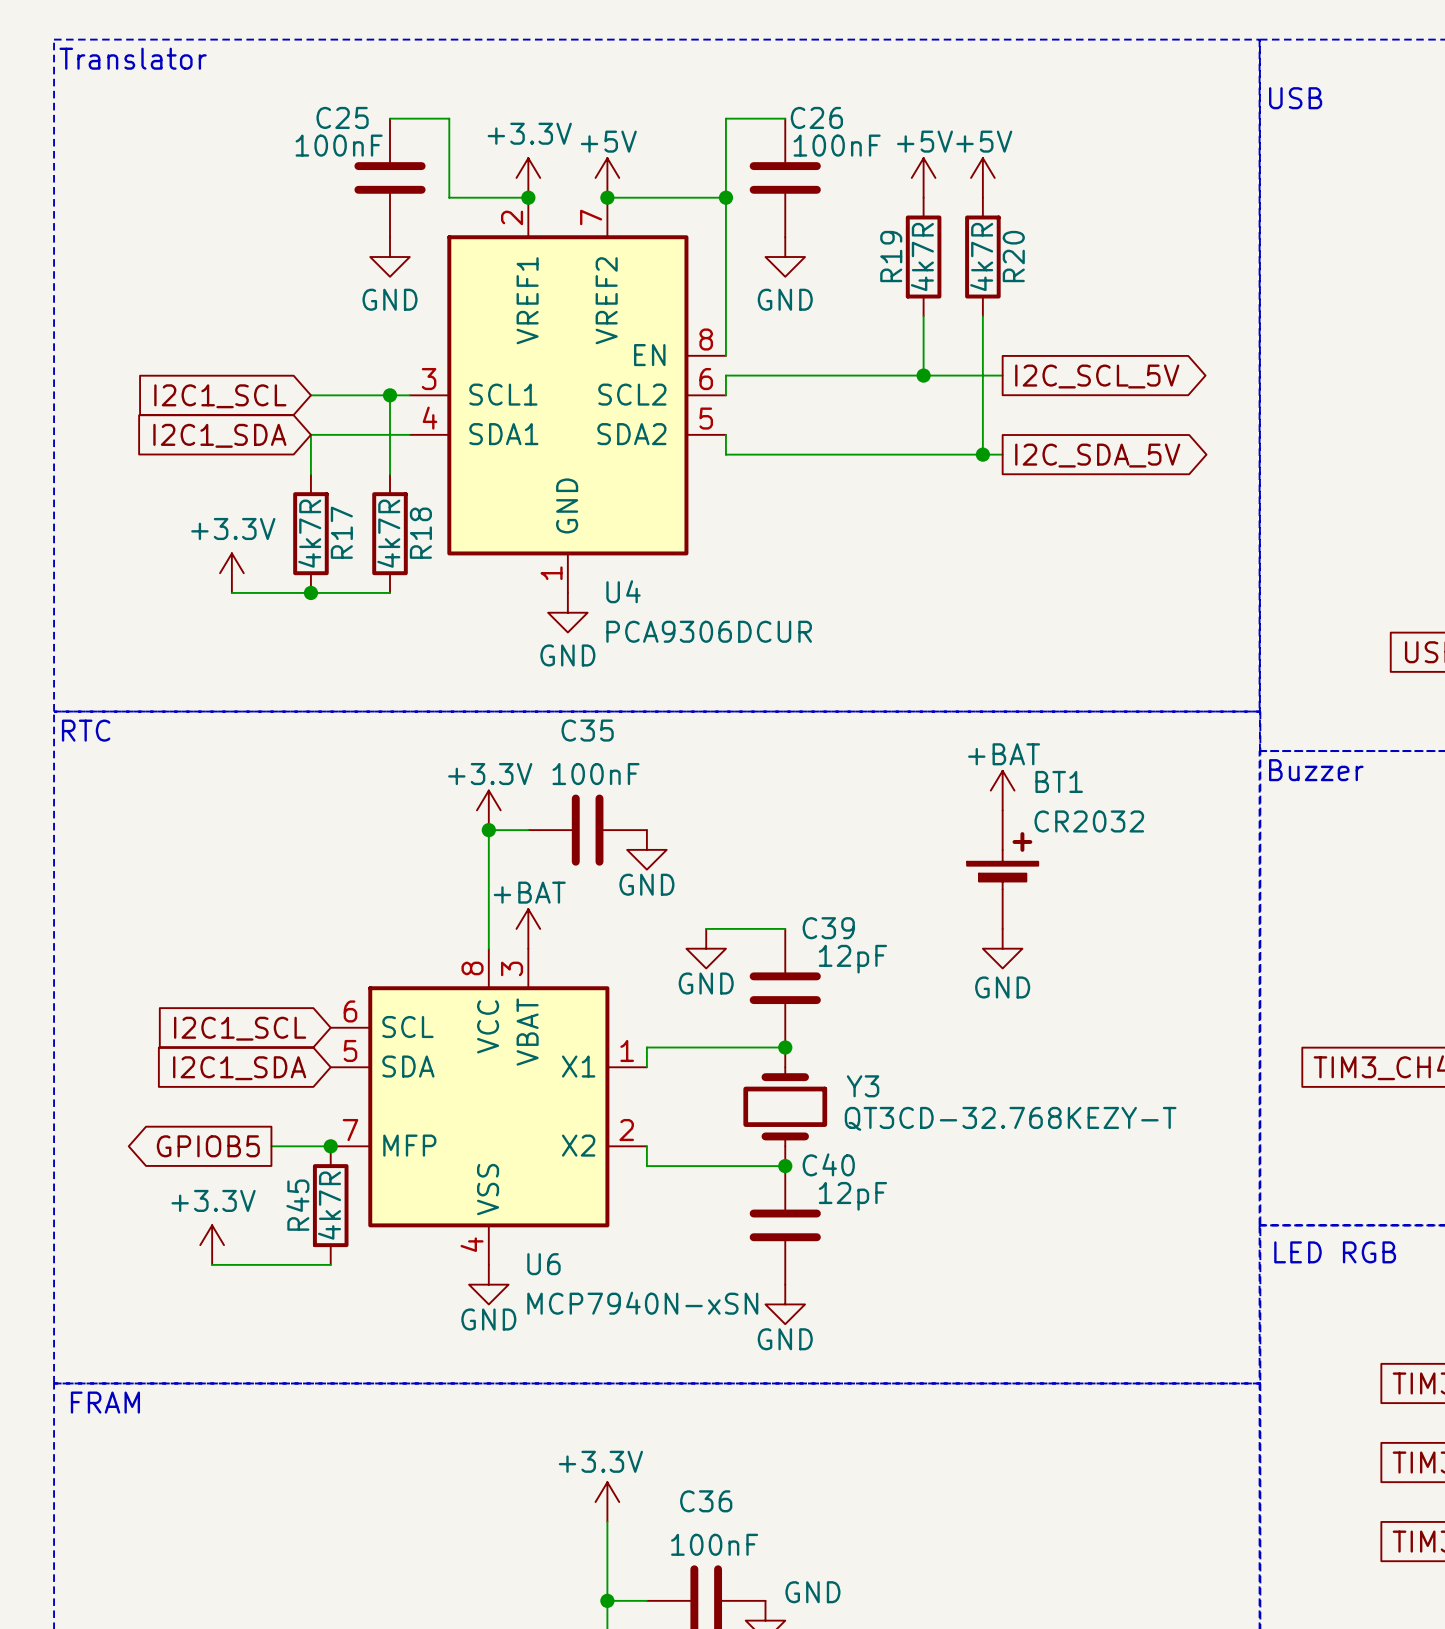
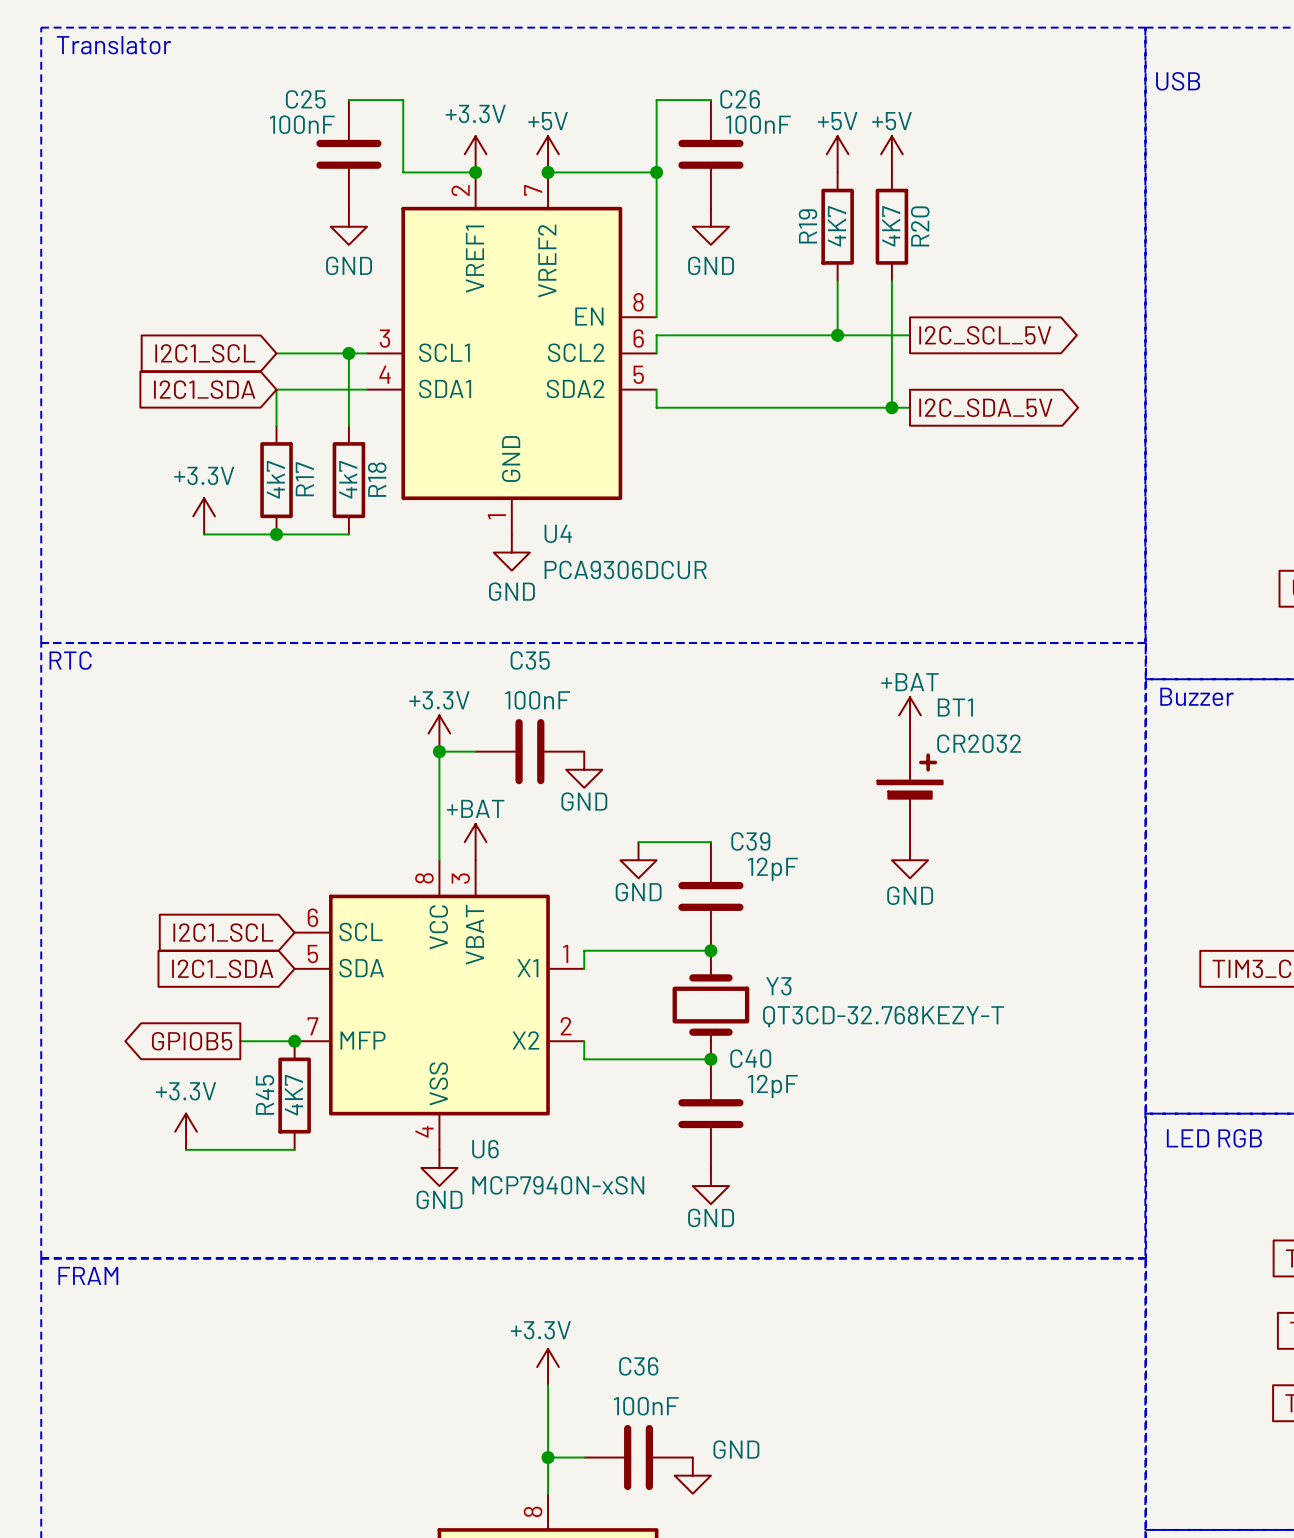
R19 value: 4k7R (922, 257) -> 4K7 (836, 226)
R20 value: 4k7R (981, 257) -> 4K7 (891, 226)
R17 value: 4k7R (309, 533) -> 4k7 (275, 479)
R18 value: 4k7R (388, 533) -> 4k7 (348, 479)
R45 value: 4k7R (329, 1205) -> 4K7 (293, 1095)

